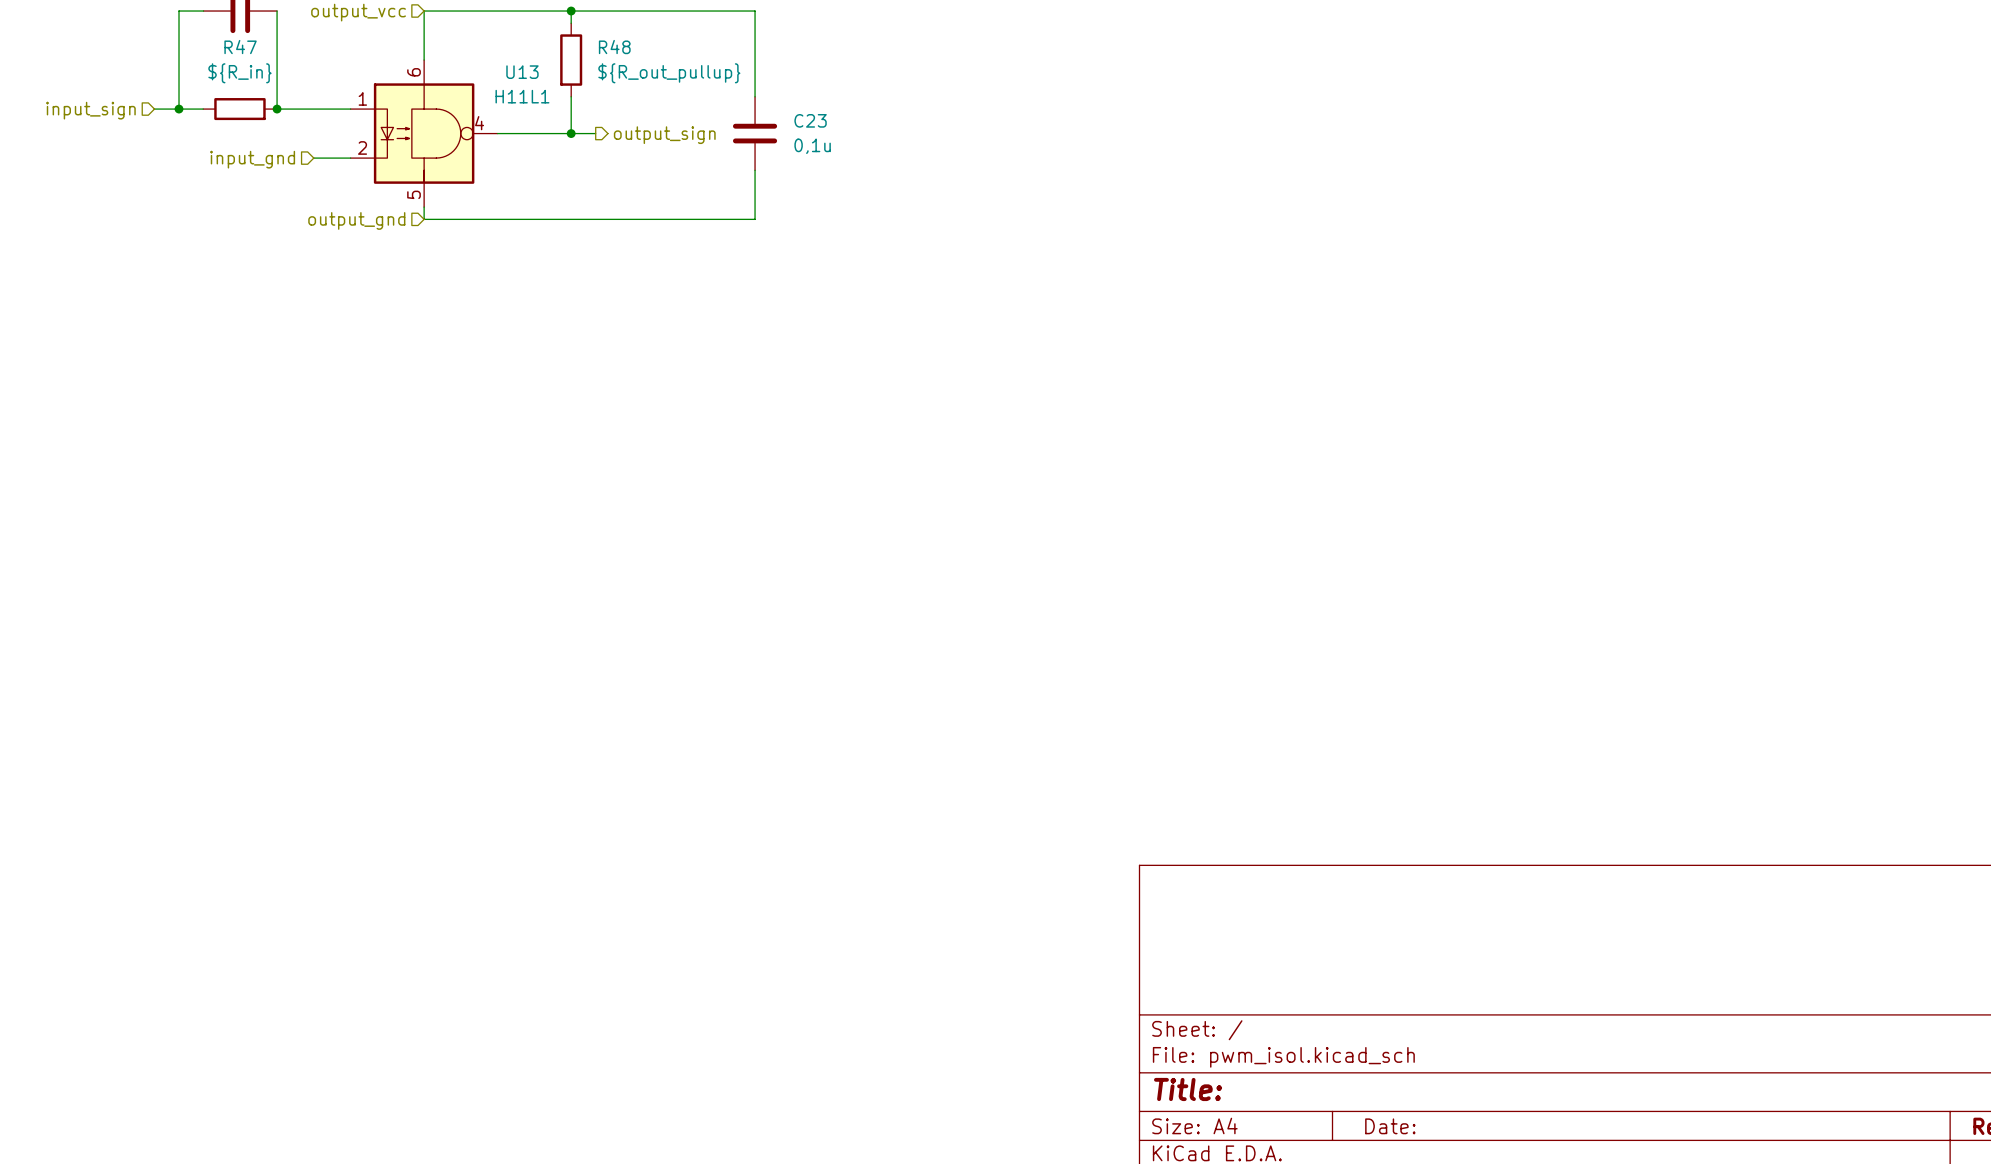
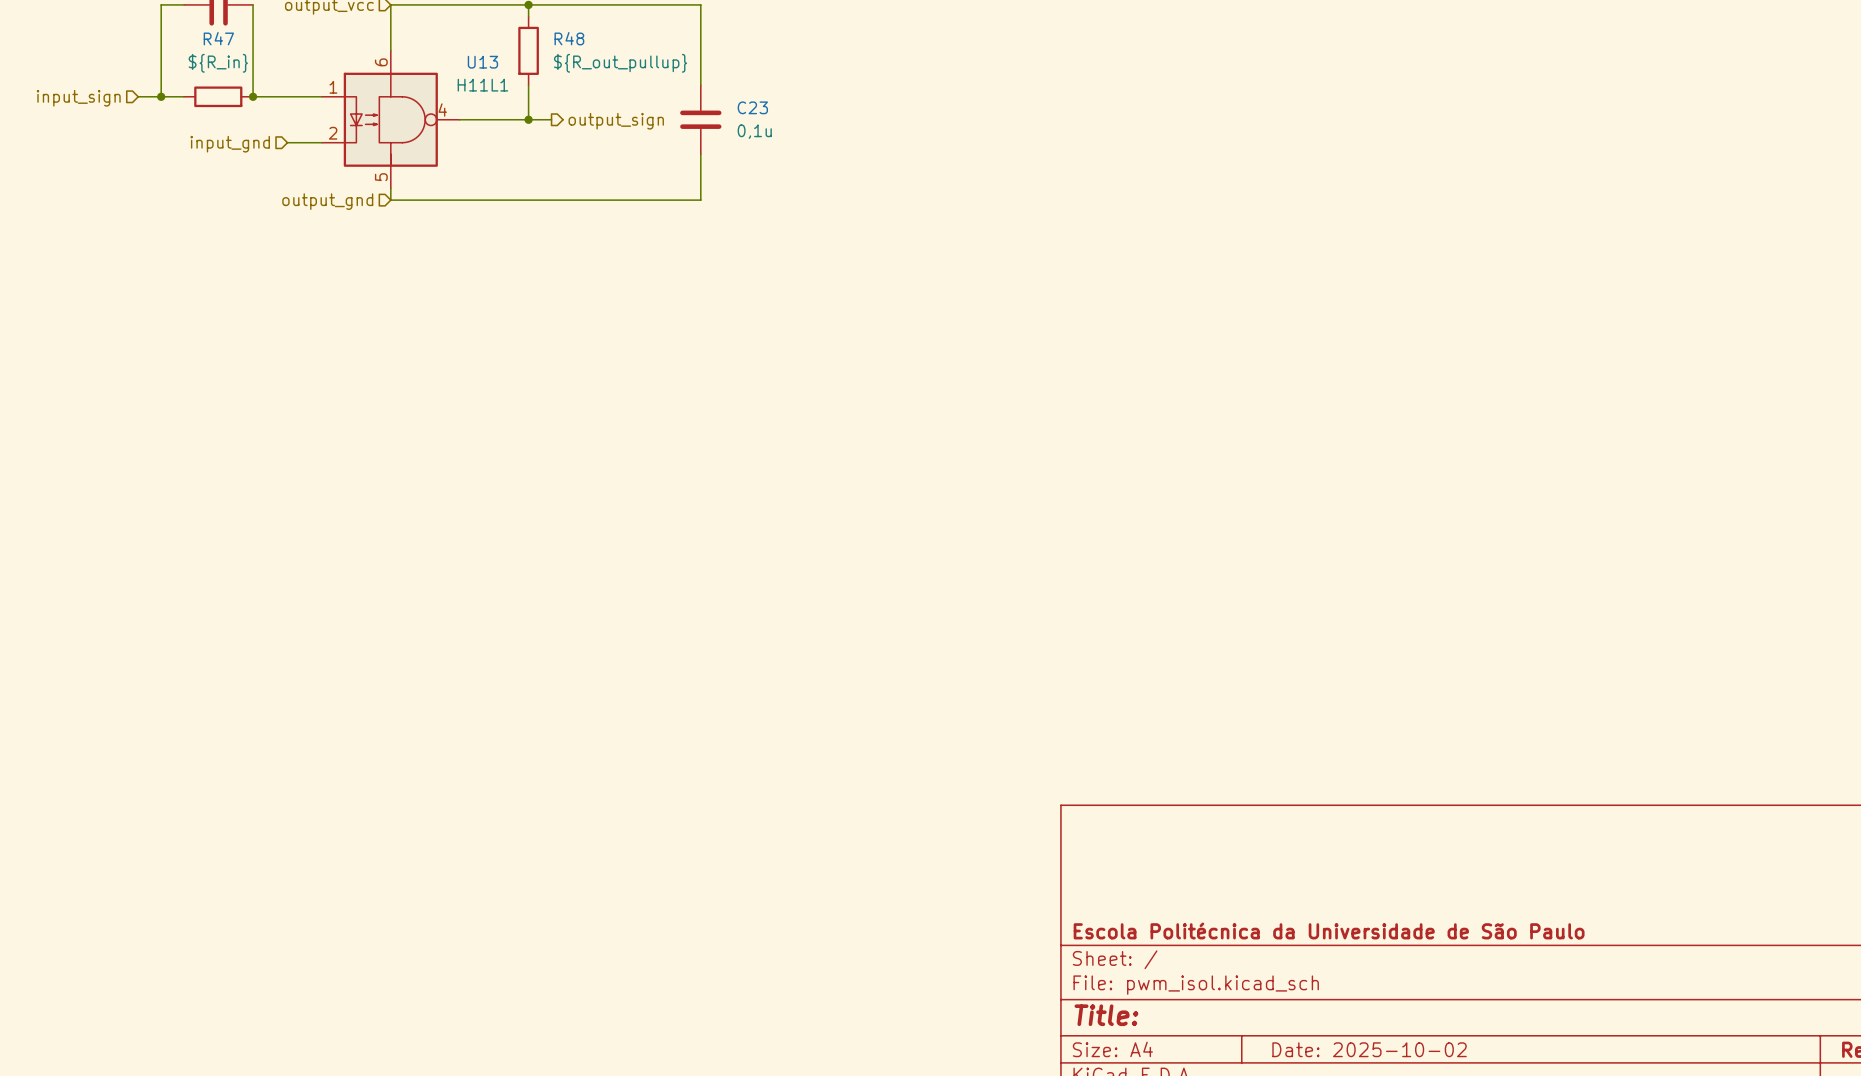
title block: none -> Escola Politécnica da Universidade de São Paulo (1329, 931)
title block: Date: (1390, 1126) -> Date: 2025-10-02 (1369, 1049)

